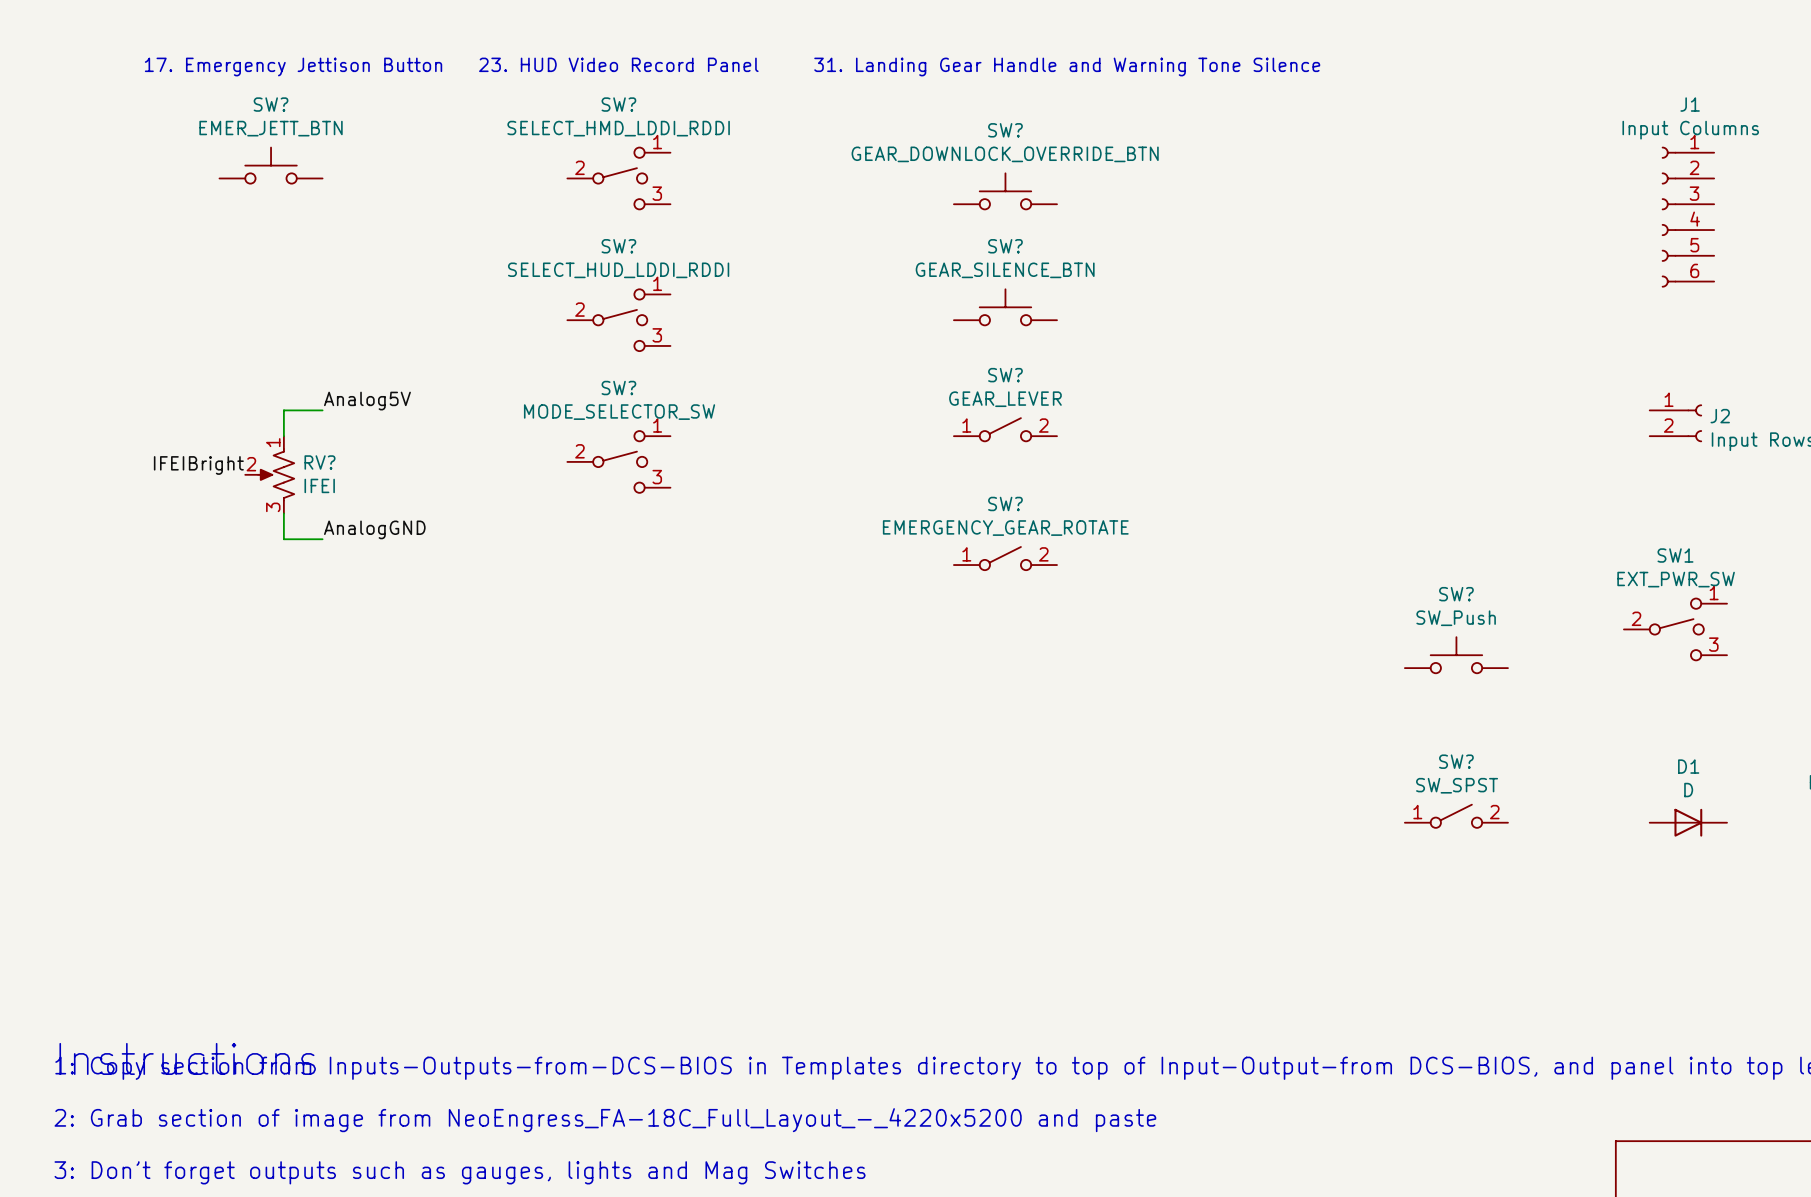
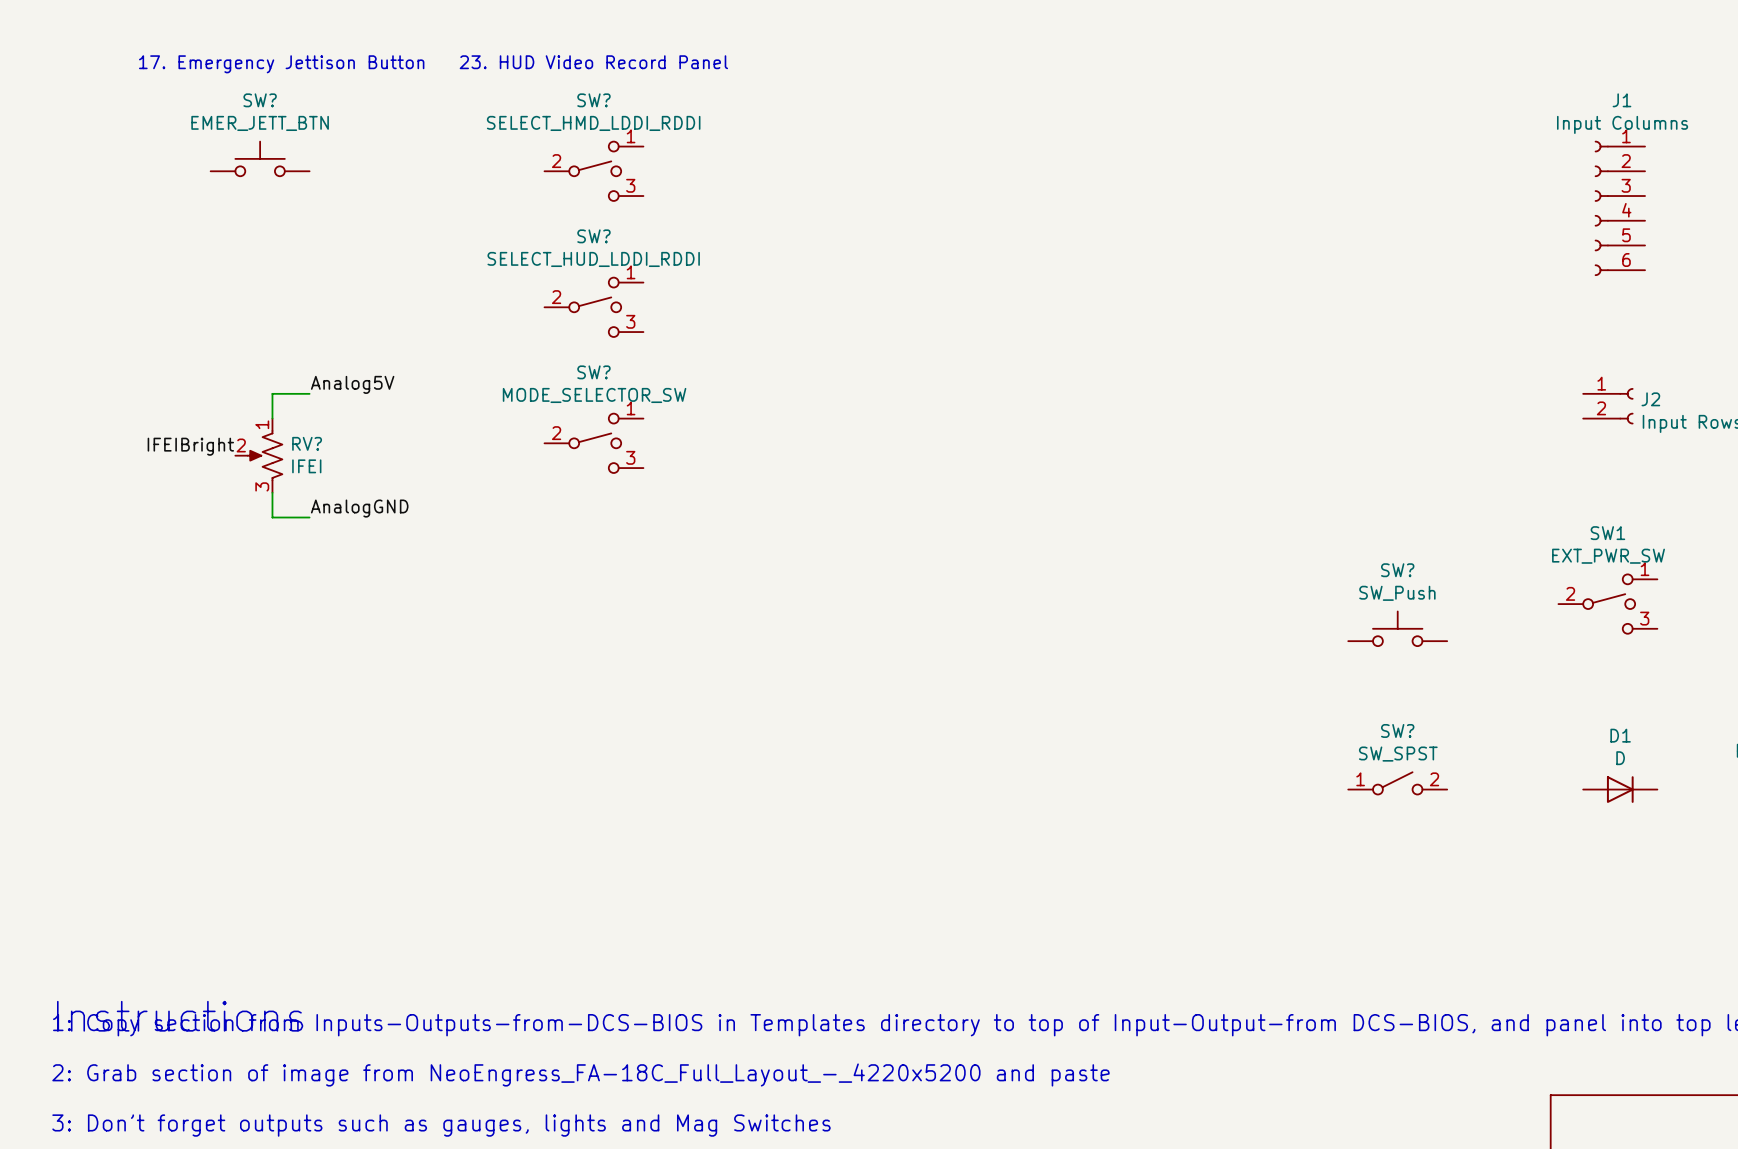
text: 31. Landing Gear Handle and Warning Tone Silence (1067, 66) -> none
SW?: GEAR_DOWNLOCK_OVERRIDE_BTN (1005, 191) -> none
SW?: GEAR_SILENCE_BTN (1005, 307) -> none
SW?: GEAR_LEVER (1005, 429) -> none
SW?: EMERGENCY_GEAR_ROTATE (1005, 558) -> none

